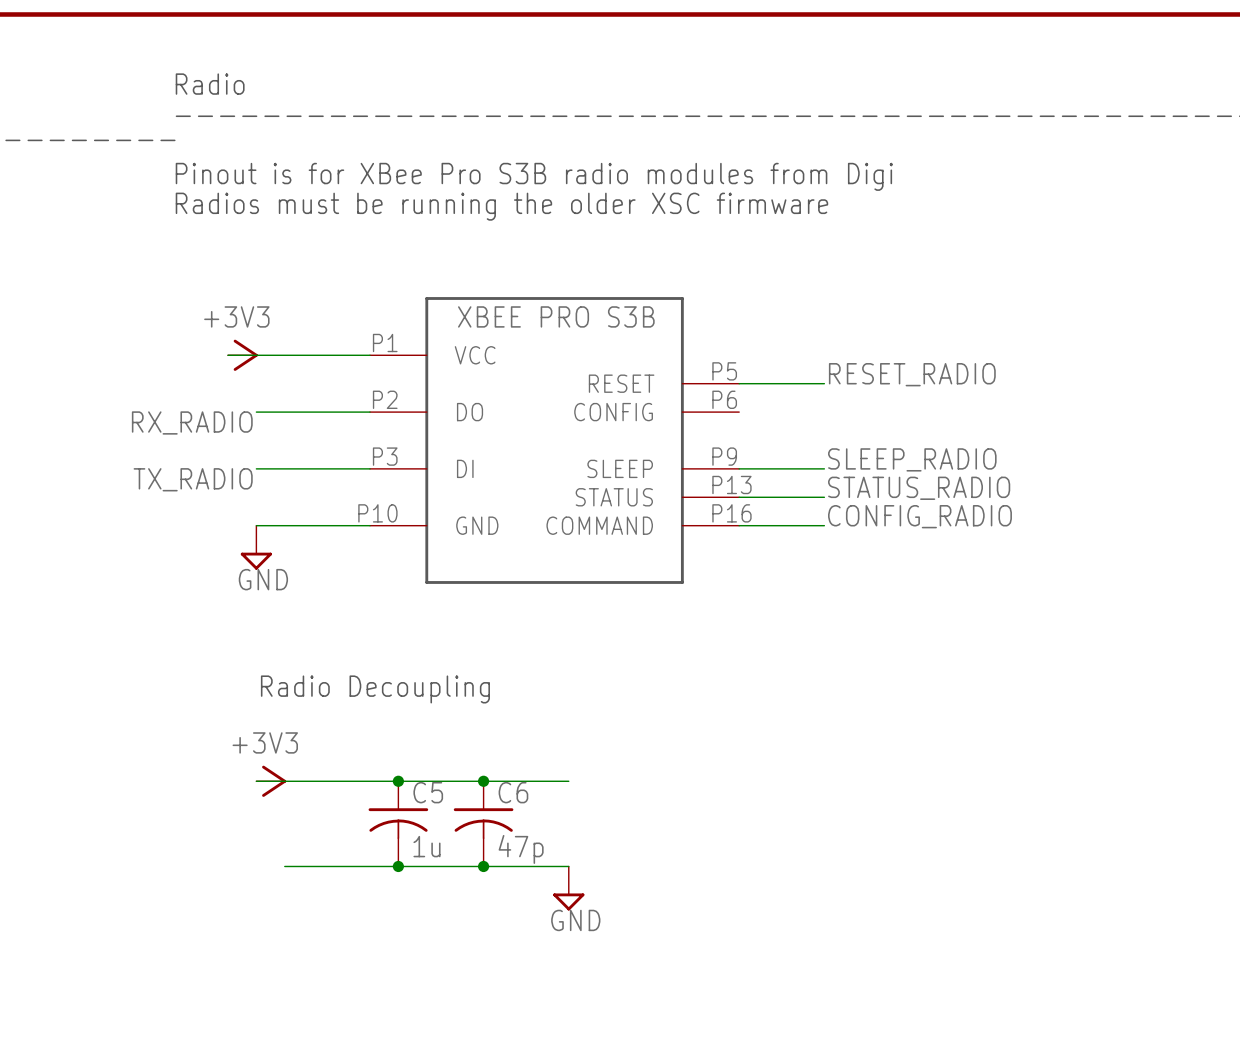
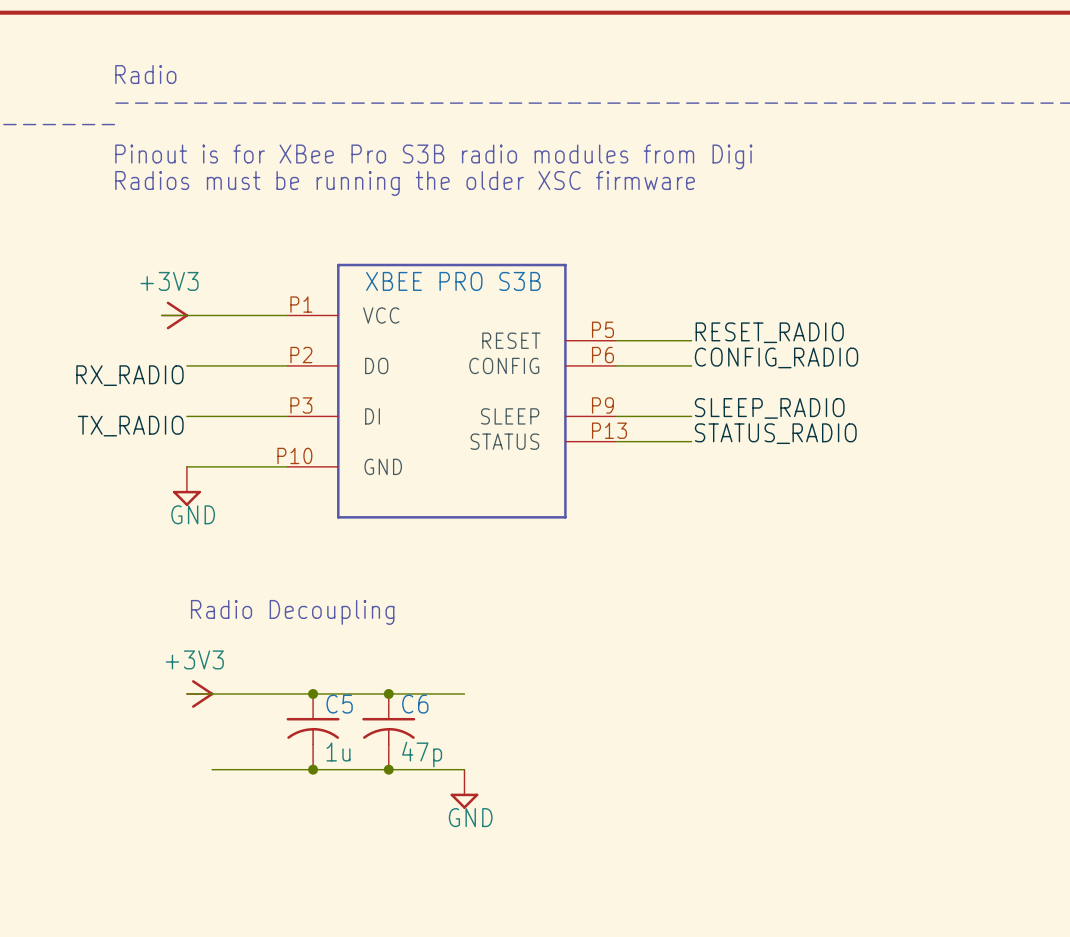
part symbol: [369, 297, 740, 584] -> [287, 263, 616, 519]
label position: CONFIG_RADIO (919, 516) -> CONFIG_RADIO (776, 357)
wire: (739, 525) (824, 525) -> (615, 365) (691, 365)

